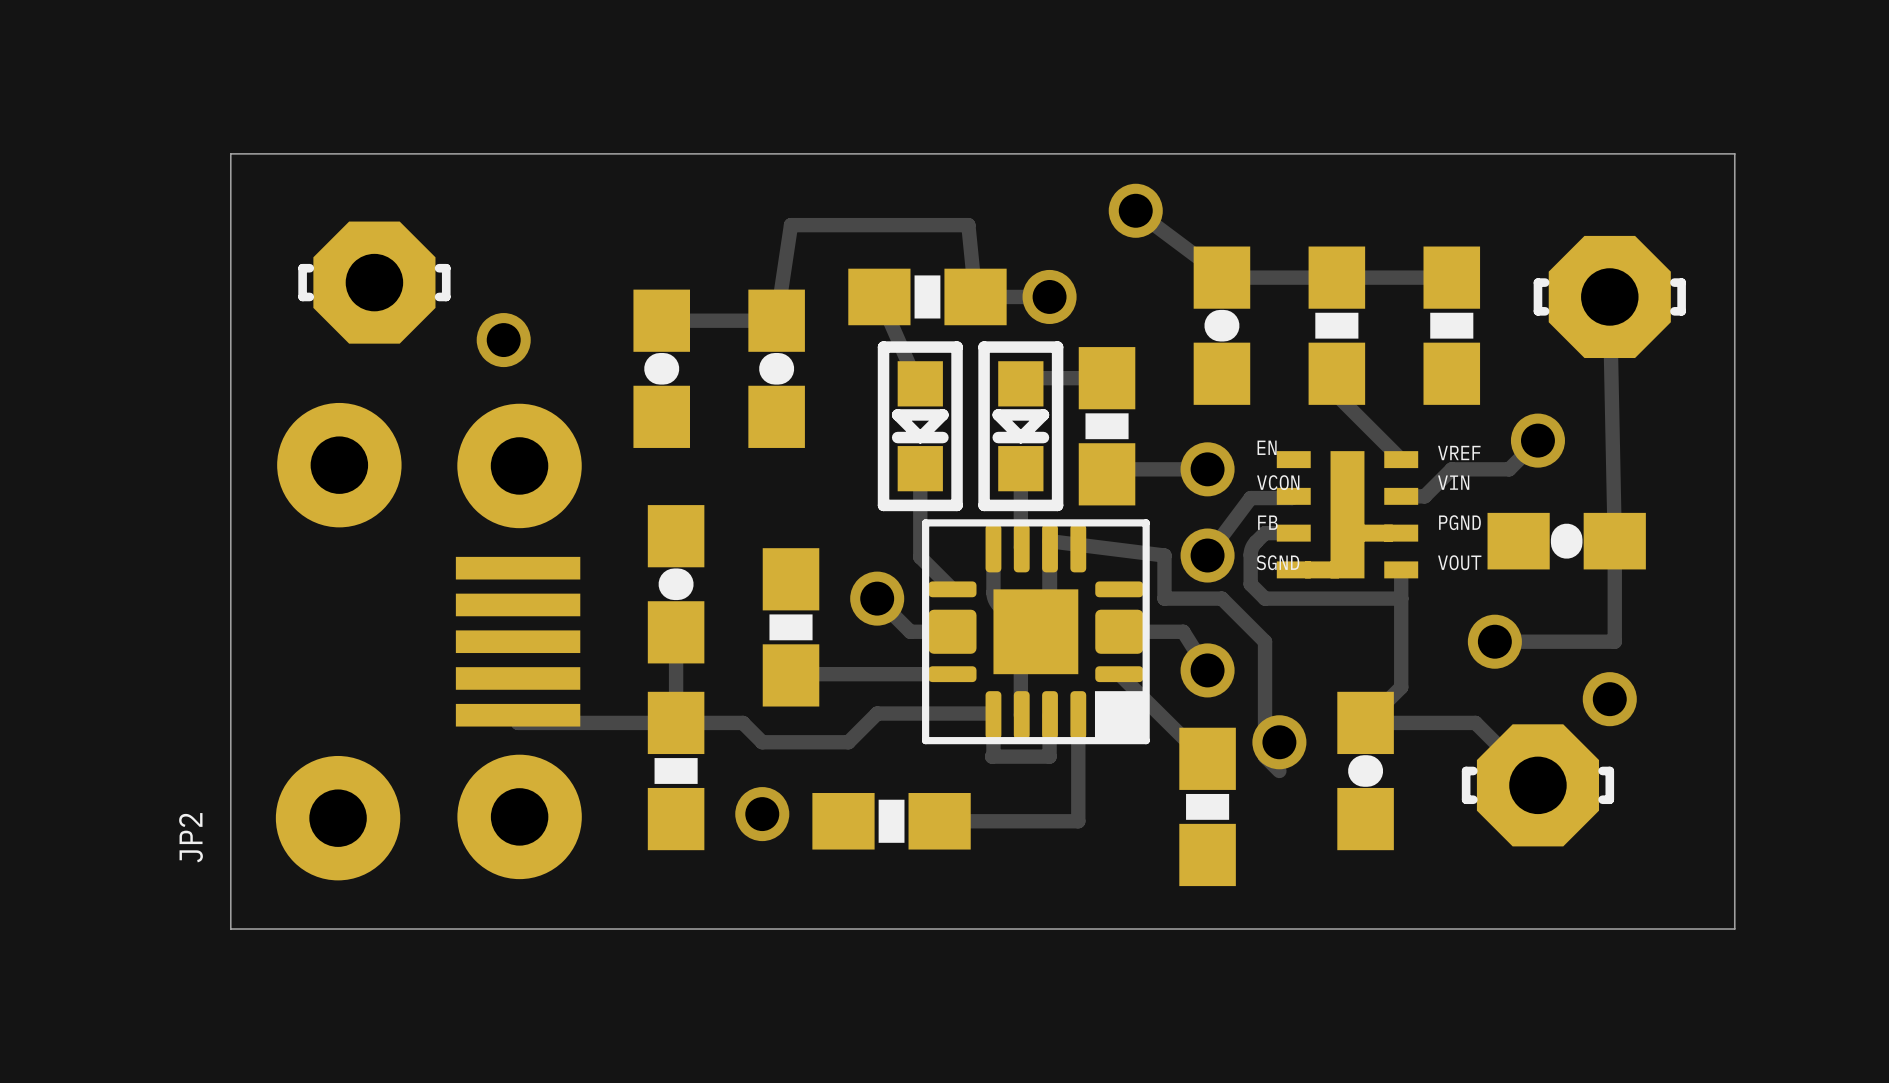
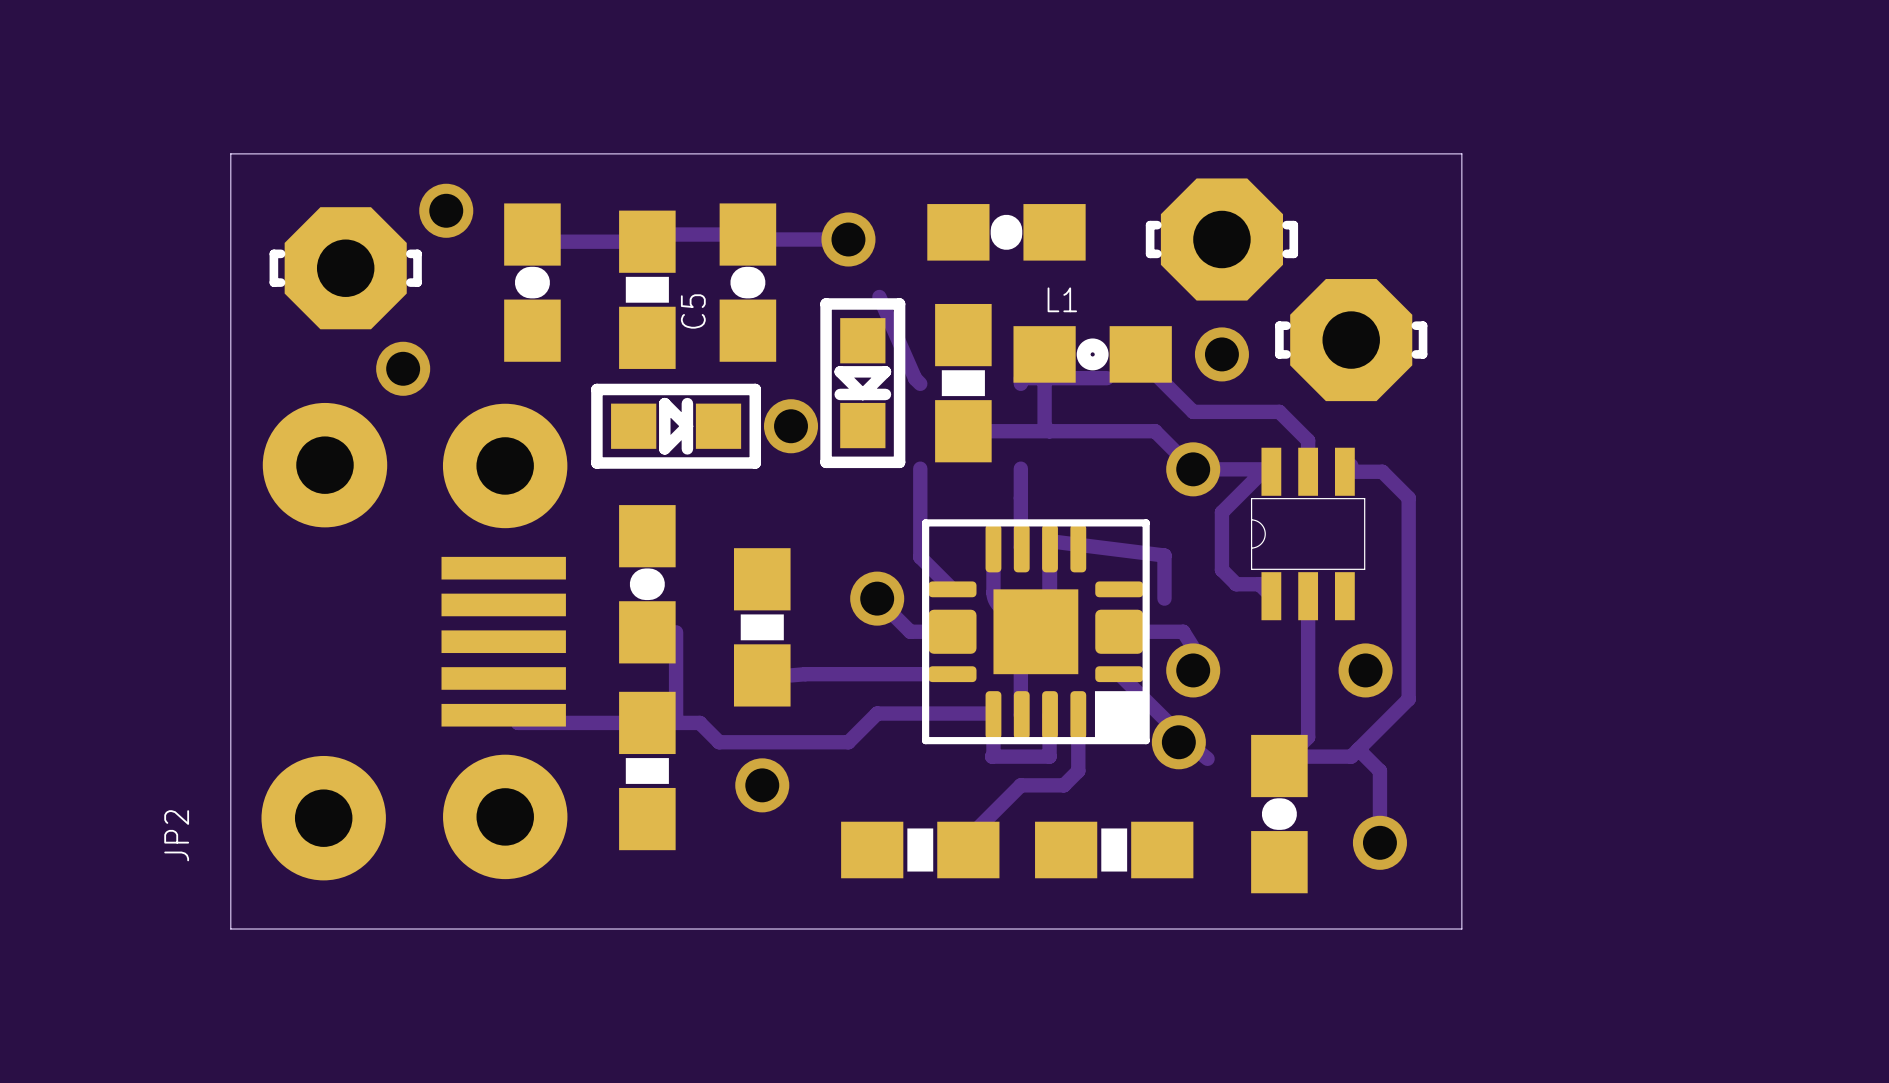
board edge: (1461, 153) (1734, 153) (1734, 929) (1461, 929) -> (1461, 153) (1461, 929)
via: none -> (446, 210)
track: (1135, 210) (1212, 268) (1221, 277) (1451, 277) -> none
via: (1135, 210) -> none
part: none -> (1006, 232)
track: none -> (532, 234) (539, 241) (647, 241) (654, 234) (747, 234) (752, 239) (848, 239)
via: none -> (848, 239)
part: none -> (1221, 239)
part footprint: [1308, 246, 1366, 405] -> [1275, 279, 1428, 402]
part position: (374, 282) -> (345, 268)
part: none -> (532, 282)
C5: none -> (747, 282)
part: none -> (647, 289)
part: (927, 296) -> none
track: (1049, 296) (975, 296) (968, 225) (791, 225) (776, 320) (661, 320) -> none
via: (1049, 296) -> none
track: (1609, 296) (1614, 641) (1494, 641) -> none
part: (1609, 296) -> none
part: (1221, 325) -> none
part: (1451, 325) -> none
via: (503, 340) -> none
track: none -> (1044, 354) (1044, 426) (1049, 431)
L1: none -> (1092, 354)
track: none -> (1140, 354) (1140, 359) (1193, 411) (1279, 411) (1308, 440) (1308, 471)
via: none -> (1221, 354)
via: none -> (403, 368)
part: (661, 368) -> none
part: (776, 368) -> none
track: (1336, 373) (1336, 395) (1401, 459) -> none
part: none -> (963, 383)
part: none -> (676, 426)
via: none -> (791, 426)
part position: (920, 426) -> (862, 383)
part: (1020, 426) -> none
part: (1107, 426) -> none
track: (1537, 440) (1509, 469) (1451, 469) (1424, 496) (1401, 496) -> none
via: (1537, 440) -> none
part footprint: [1276, 451, 1419, 579] -> [1251, 447, 1365, 621]
track: none -> (1351, 465) (1344, 471) (1382, 471) (1408, 498) (1408, 699) (1351, 756) (1288, 756)
track: (1193, 469) (1112, 469) (1107, 474) -> (1193, 469) (1155, 431) (963, 431)
track: none -> (1207, 469) (1268, 469) (1271, 471) (1262, 471) (1221, 512) (1221, 569) (1236, 584) (1259, 584) (1271, 596)
via position: (1207, 469) -> (1193, 469)
track: (1293, 496) (1292, 498) (1250, 498) (1207, 555) -> none
track: (1293, 533) (1265, 533) (1252, 548) (1250, 584) (1265, 598) (1401, 598) -> none
part: (1566, 541) -> none
via: (1207, 555) -> none
track: (1401, 569) (1401, 687) (1365, 722) (1475, 722) (1537, 785) -> none
part position: (676, 584) -> (647, 584)
track: none -> (1308, 596) (1308, 737) (1279, 766)
track: (1164, 598) (1221, 598) (1265, 641) (1265, 756) (1279, 770) -> none
part position: (791, 627) -> (762, 627)
JP2 position: (428, 641) -> (414, 641)
via: (1494, 641) -> none
via position: (1207, 670) -> (1193, 670)
via: none -> (1365, 670)
via: (1609, 699) -> none
track: (699, 722) (742, 722) (762, 742) -> (699, 722) (719, 742) (762, 742)
via: none -> (1178, 742)
via: (1279, 742) -> none
track: none -> (1358, 749) (1379, 770) (1379, 842)
part position: (676, 770) -> (647, 770)
track: (1078, 770) (1078, 821) (939, 821) -> (1078, 770) (1063, 785) (1020, 785) (968, 837) (968, 850)
part position: (1365, 770) -> (1279, 814)
part: (1537, 785) -> none
part rotation: 0° (1207, 806) -> 90° clockwise (1114, 850)
part position: (1207, 806) -> (1114, 850)
via position: (762, 814) -> (762, 785)
part position: (891, 821) -> (920, 850)
via: none -> (1379, 842)

